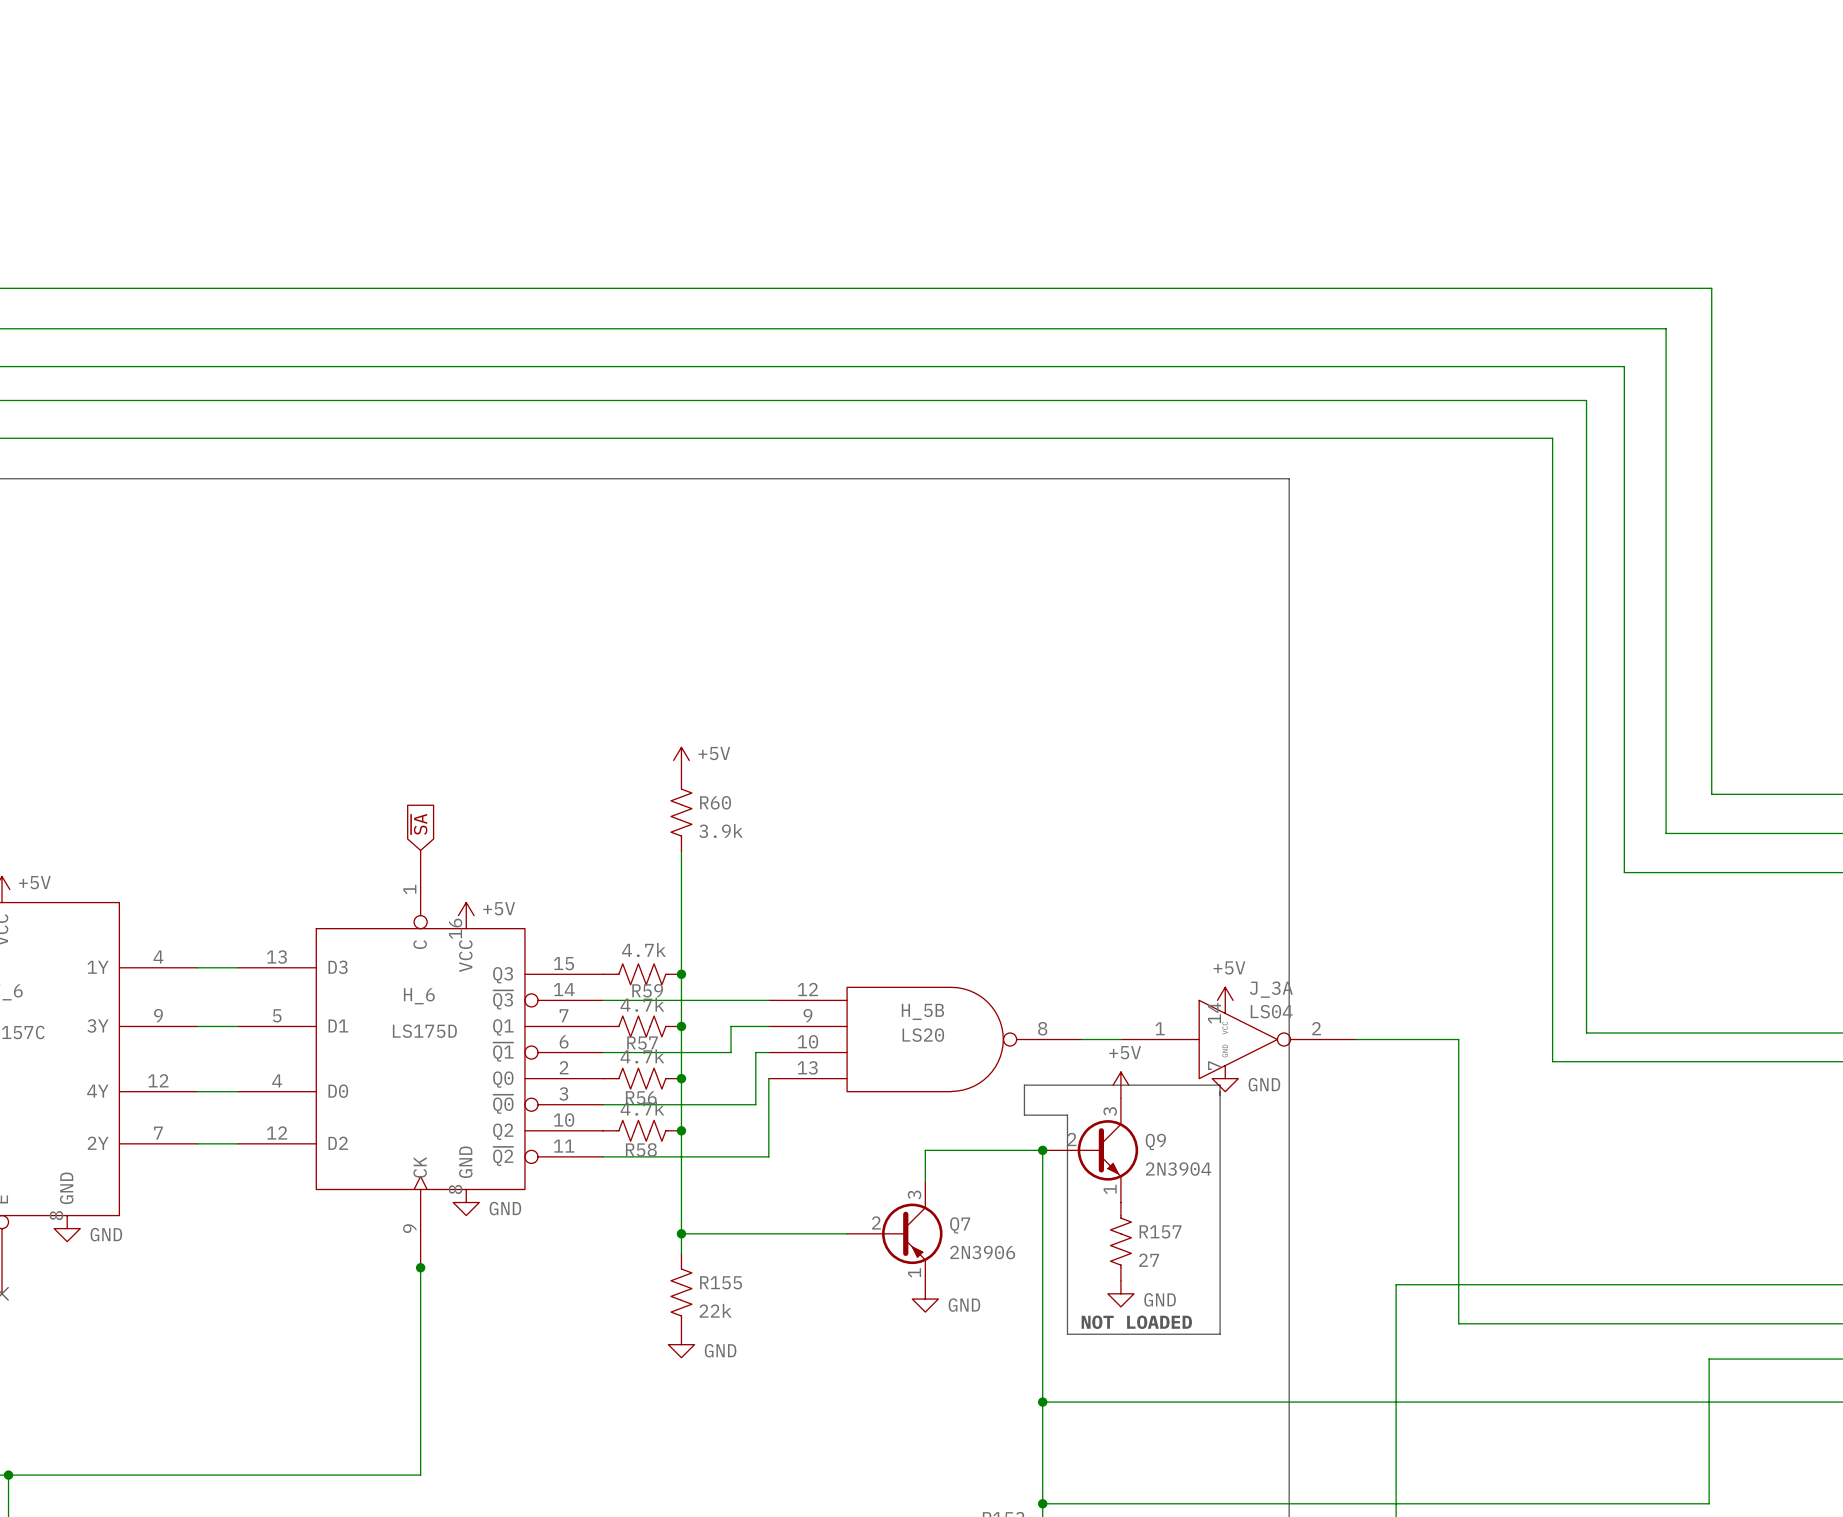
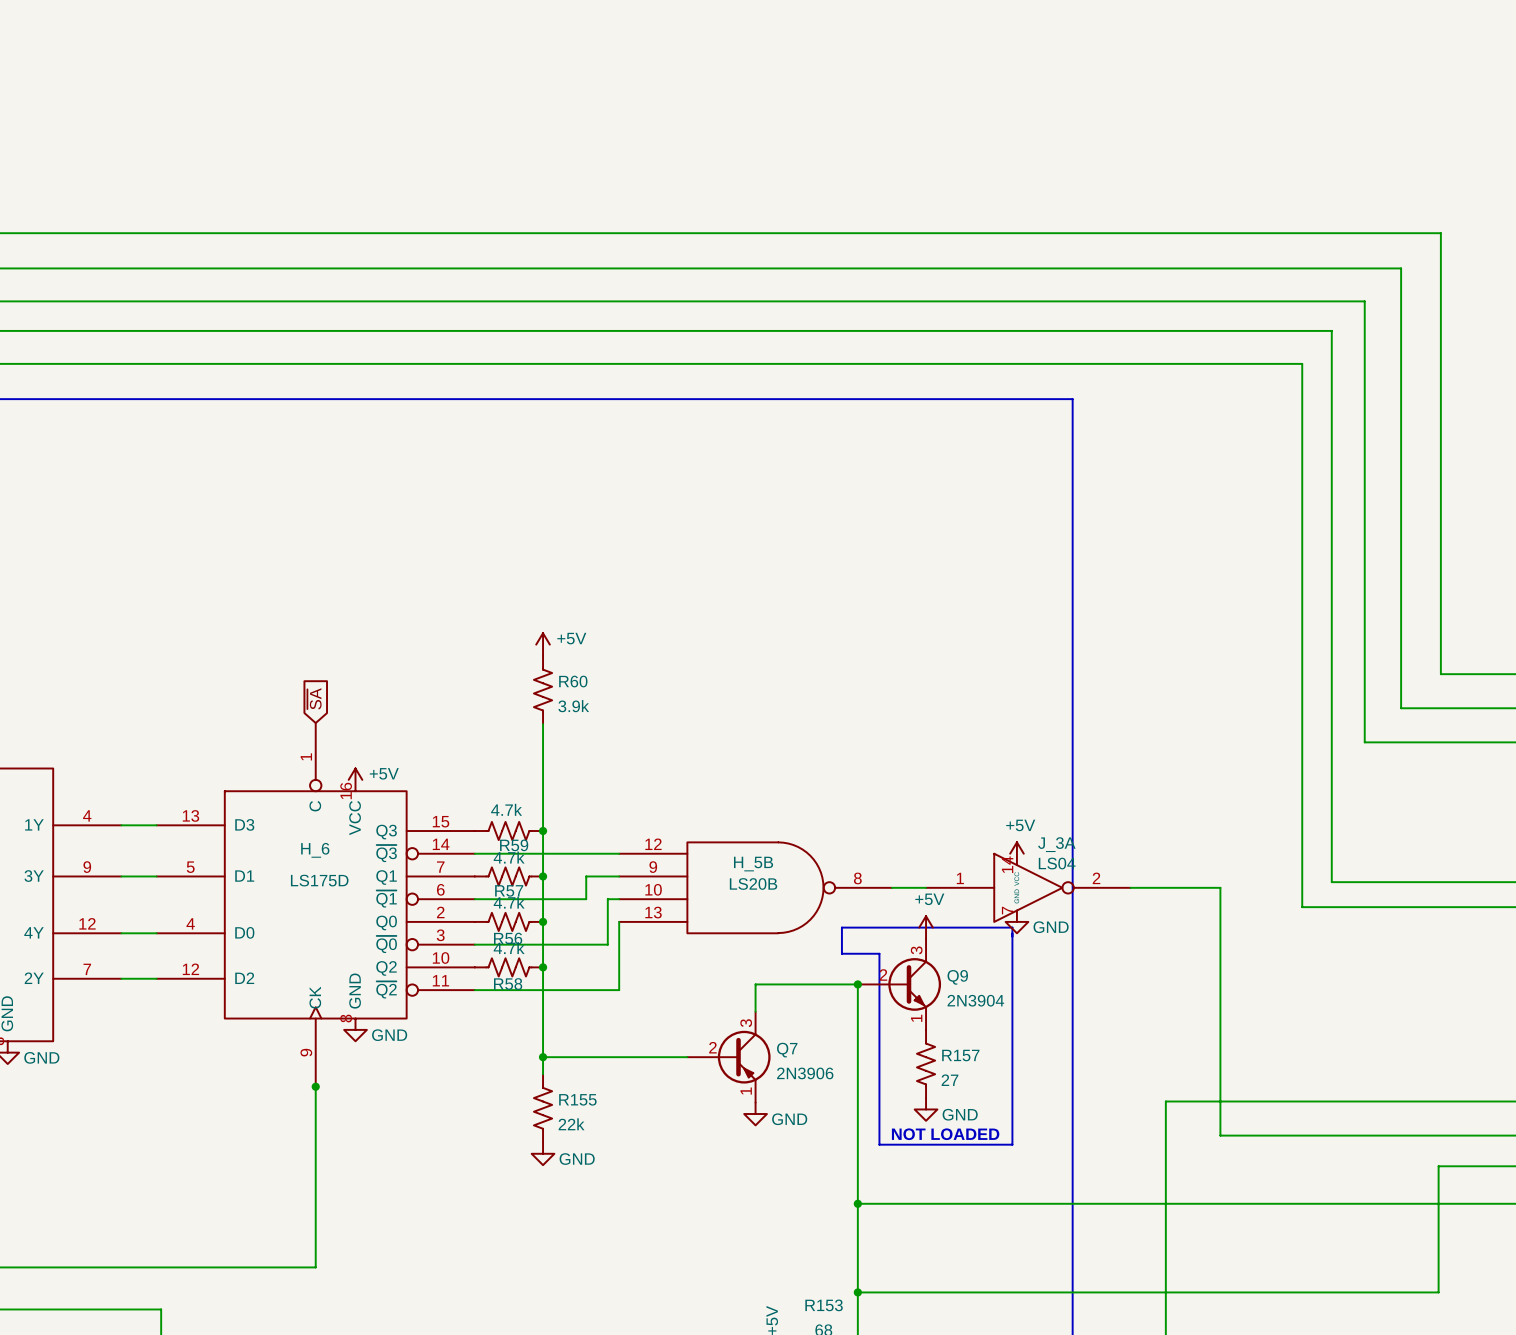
H_5B value: LS20 (923, 1035) -> LS20B (753, 883)

